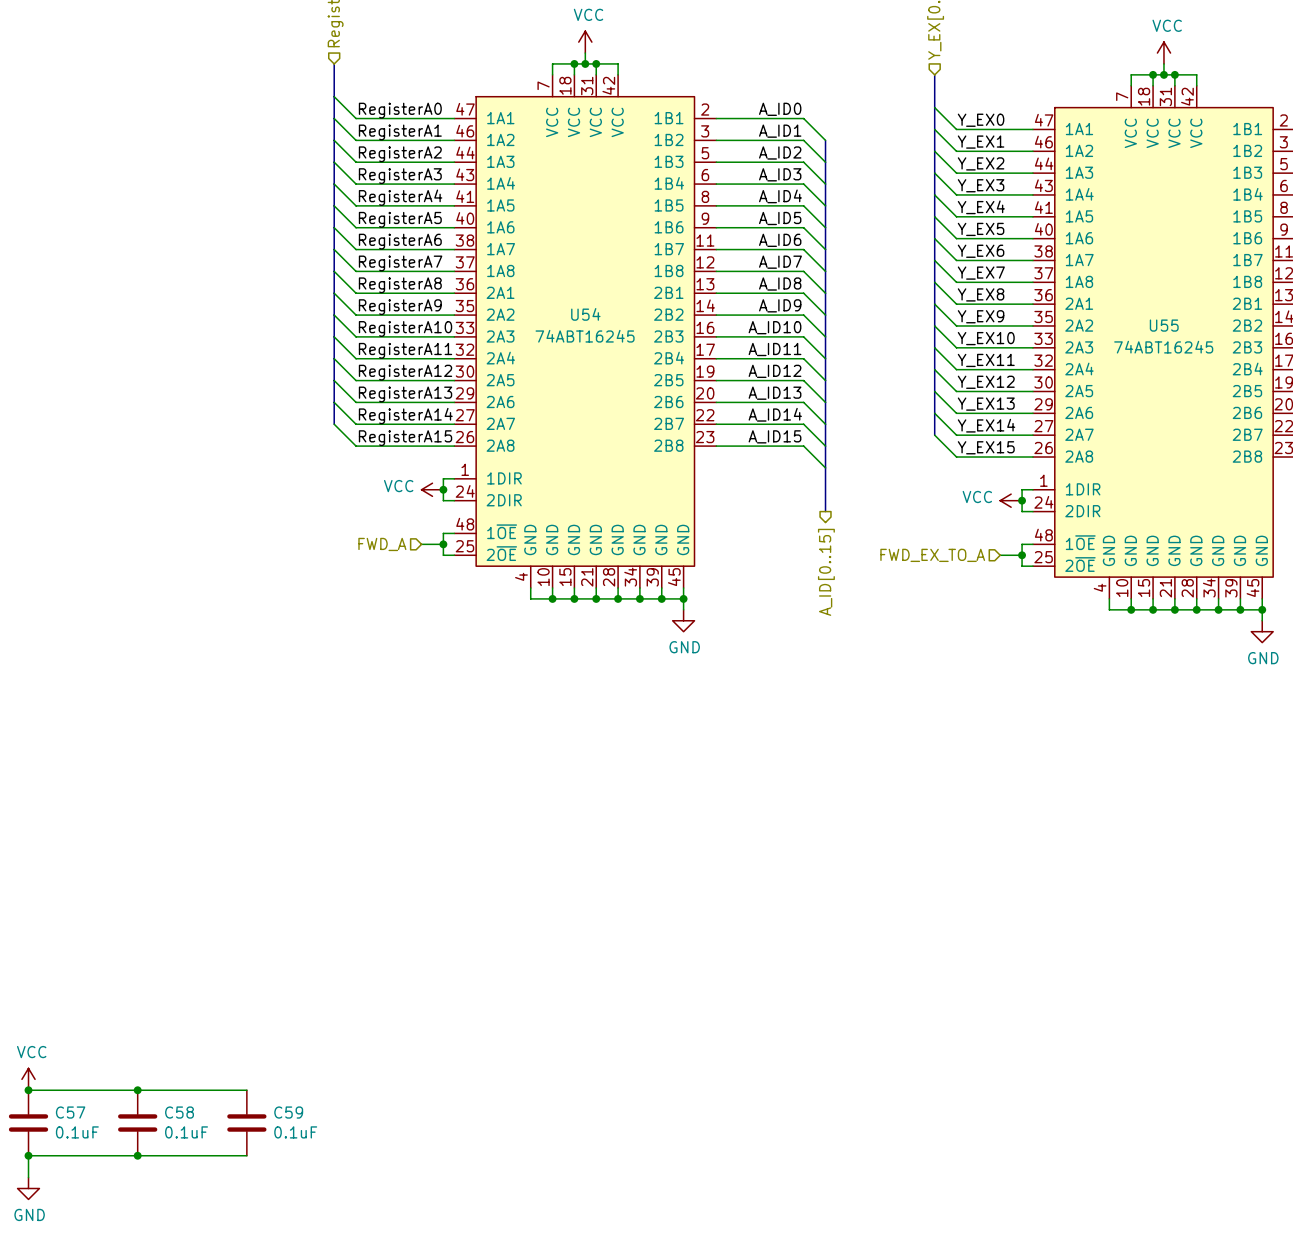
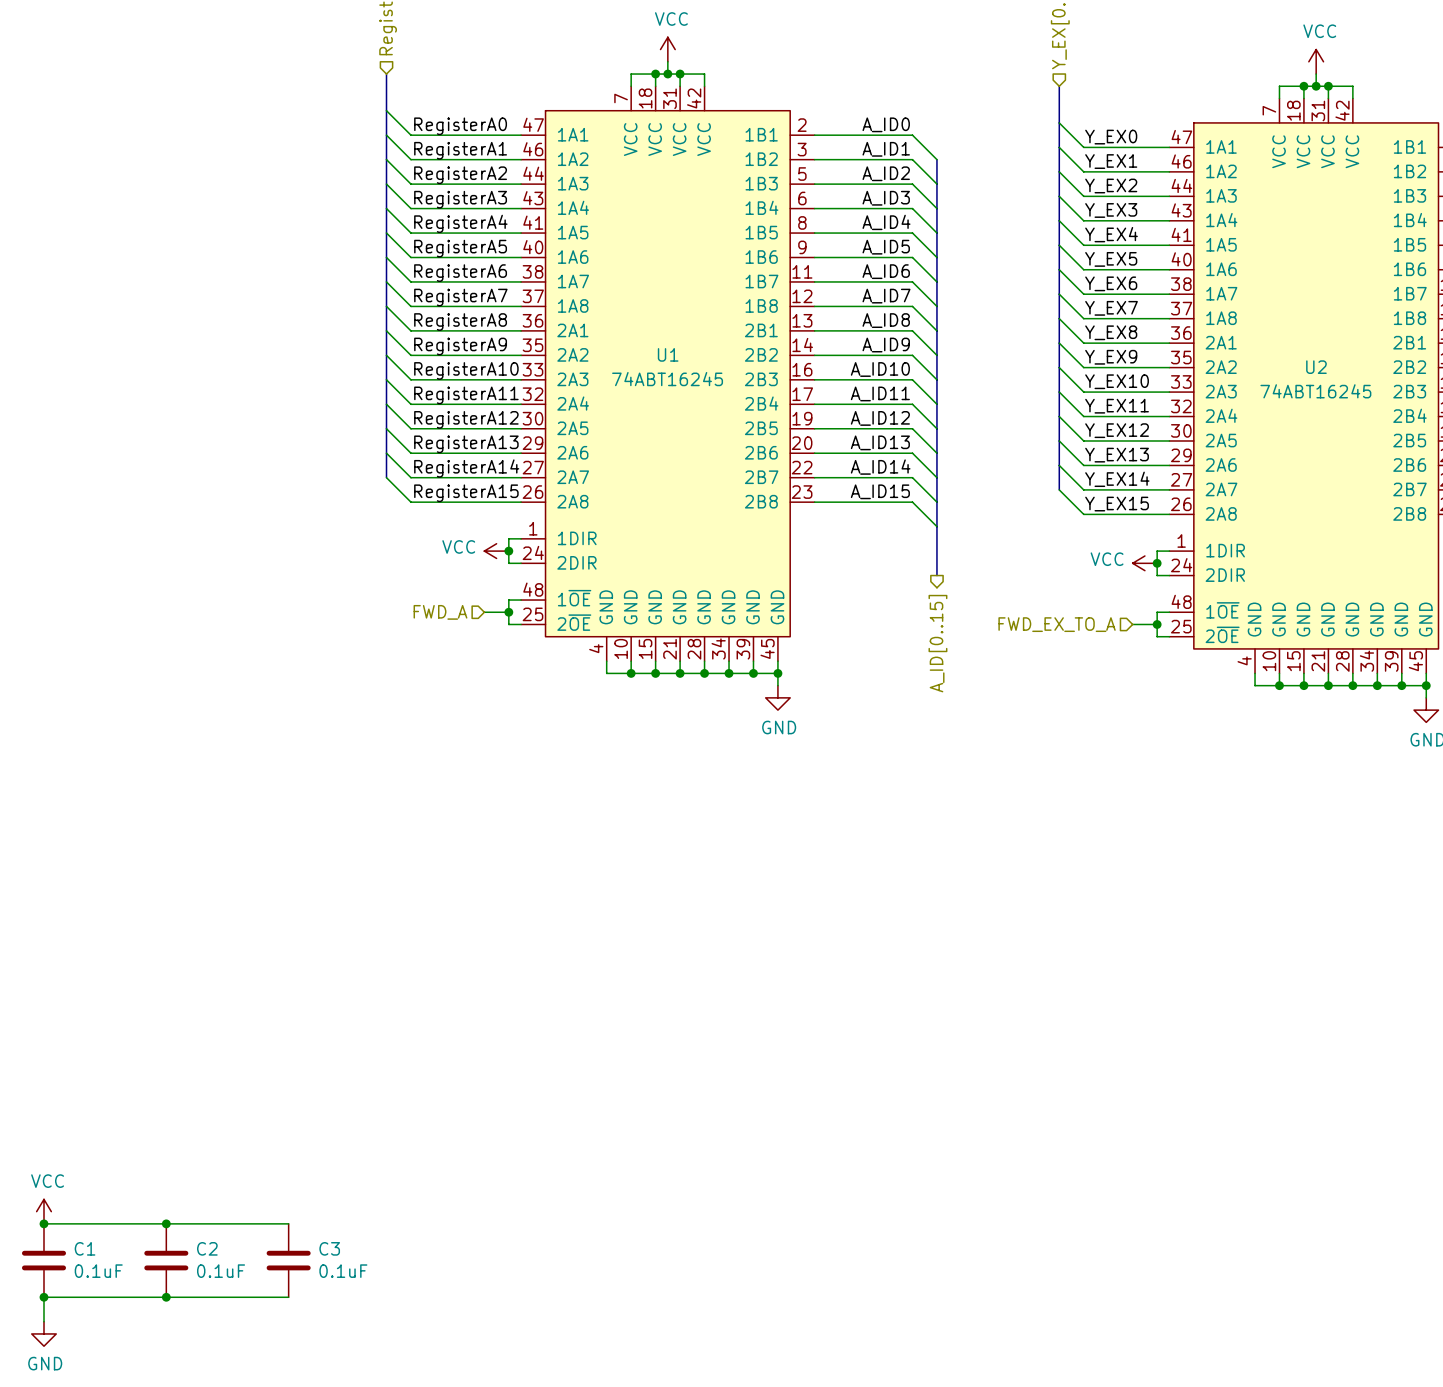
U54 name: U54 (585, 314) -> U1 (668, 354)
U55 name: U55 (1164, 325) -> U2 (1316, 367)
C57 name: C57 (70, 1112) -> C1 (85, 1248)
C58 name: C58 (179, 1112) -> C2 (207, 1248)
C59 name: C59 (288, 1112) -> C3 (329, 1248)

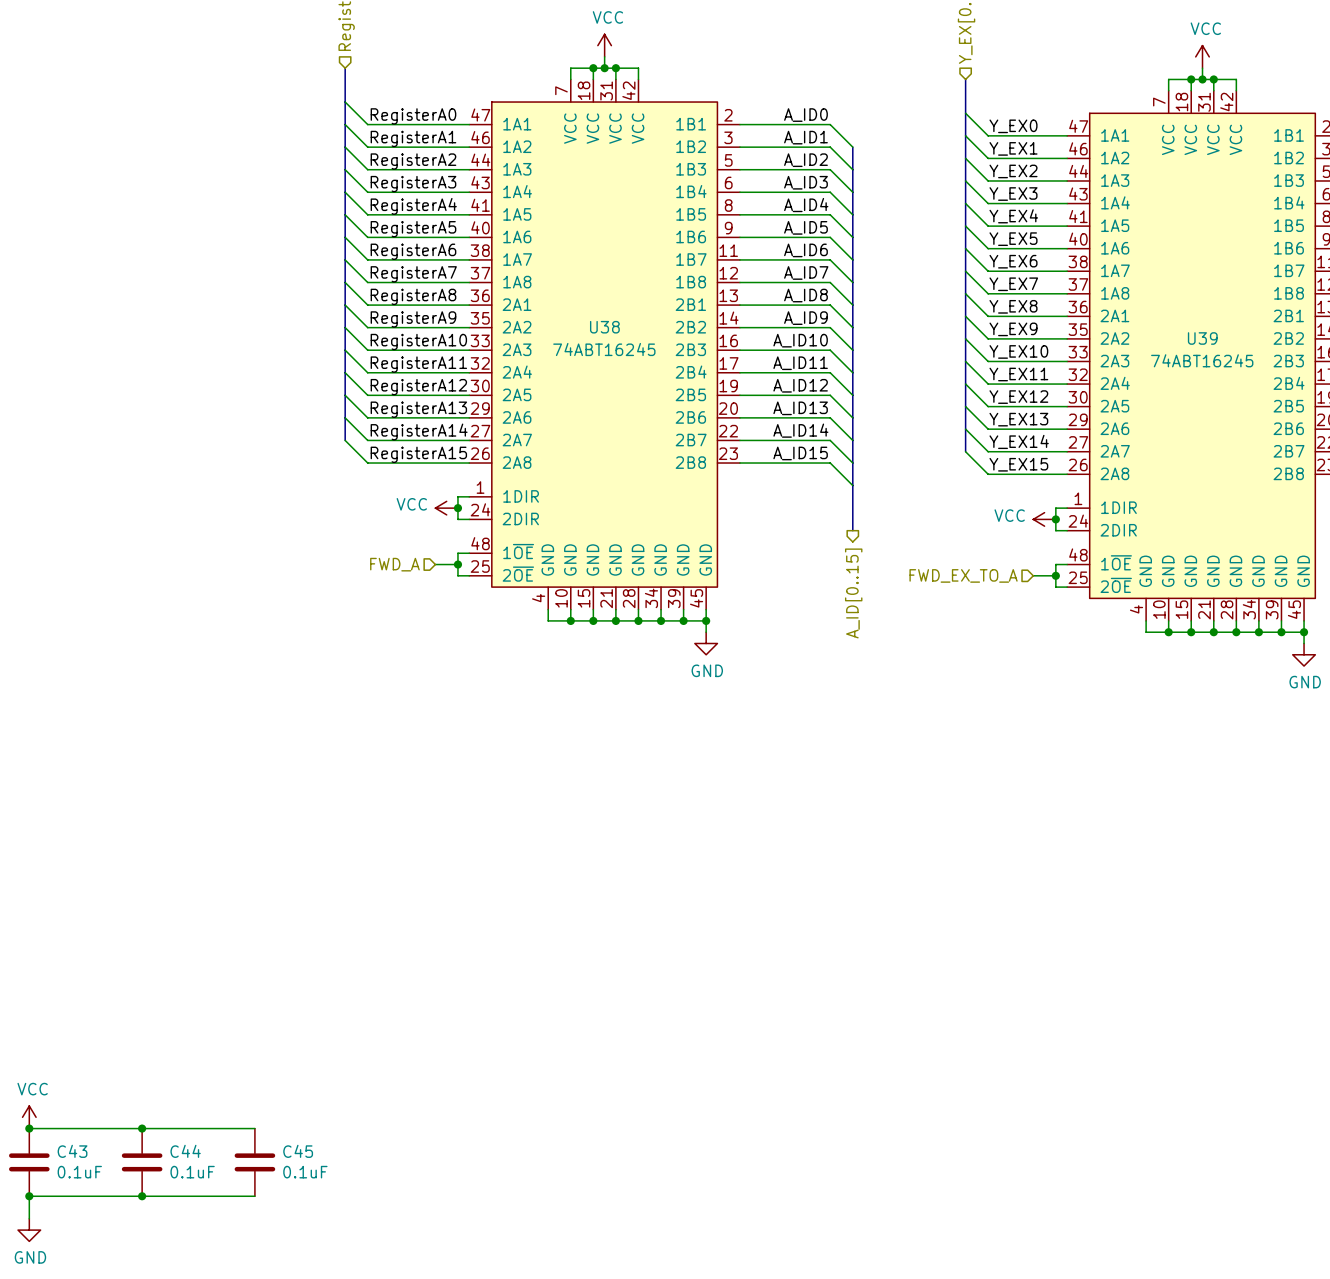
U1 name: U1 (668, 354) -> U38 (604, 327)
U2 name: U2 (1316, 367) -> U39 (1202, 338)
C1 name: C1 (85, 1248) -> C43 (72, 1151)
C2 name: C2 (207, 1248) -> C44 (185, 1151)
C3 name: C3 (329, 1248) -> C45 (298, 1151)

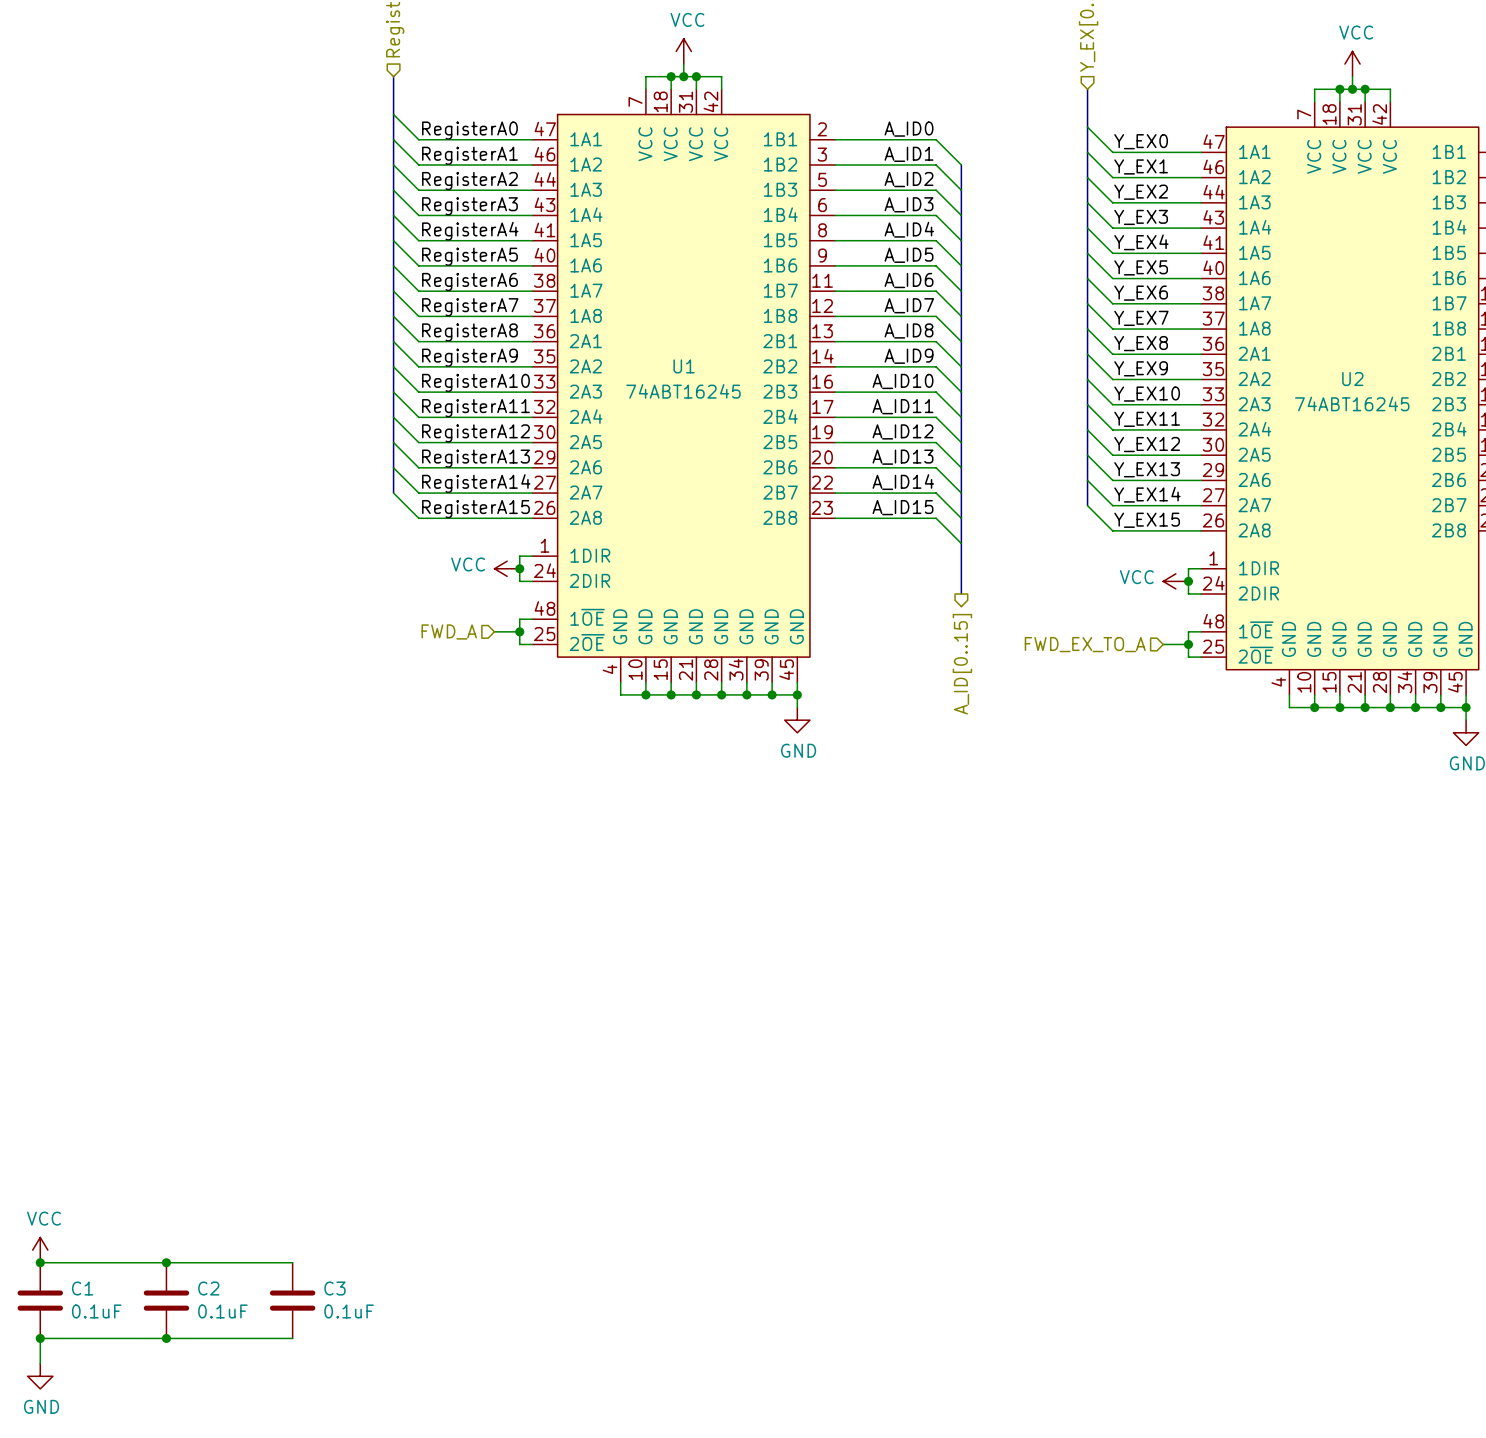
U38 name: U38 (604, 327) -> U1 (684, 366)
U39 name: U39 (1202, 338) -> U2 (1352, 379)
C43 name: C43 (72, 1151) -> C1 (82, 1288)
C44 name: C44 (185, 1151) -> C2 (208, 1288)
C45 name: C45 (298, 1151) -> C3 (334, 1288)

